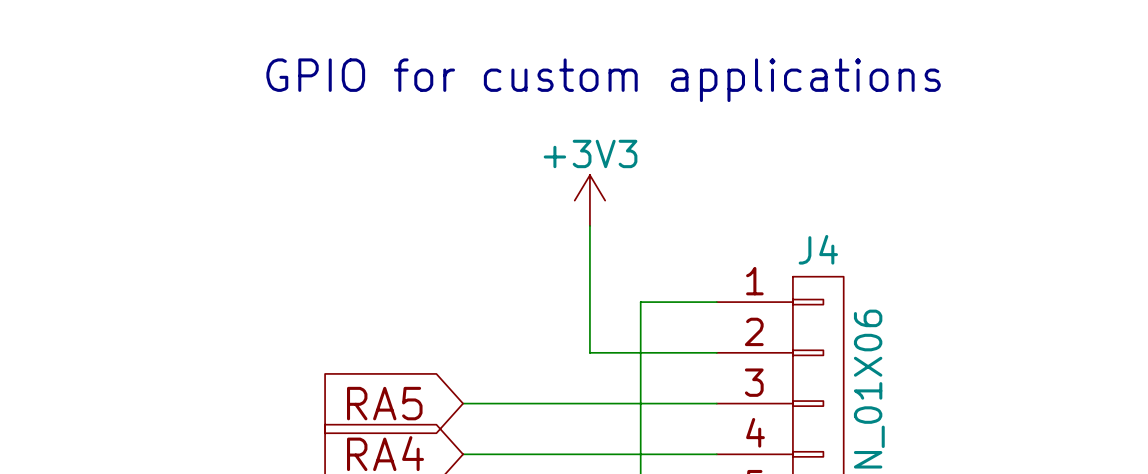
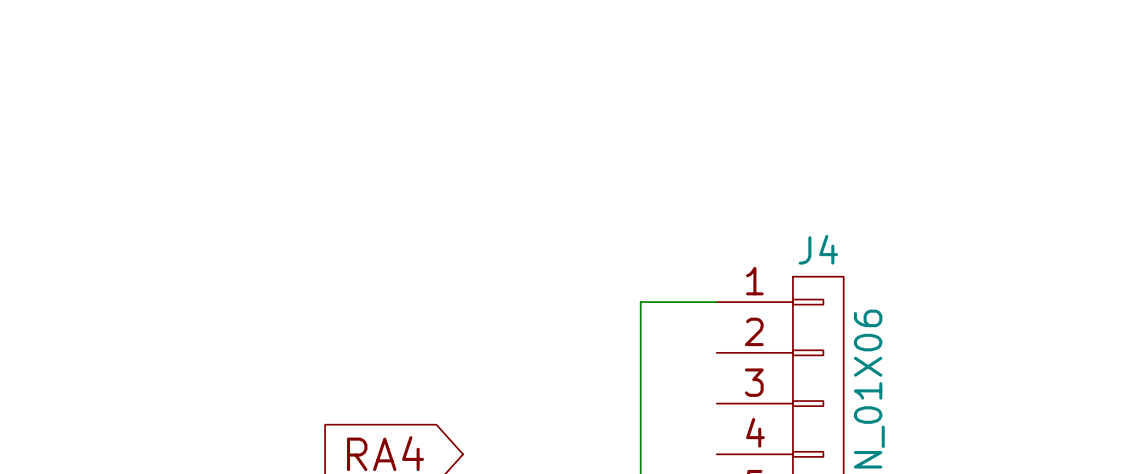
text: GPIO for custom applications (603, 80) -> none
power symbol: +3V3 (589, 200) -> none
wire: (589, 225) (589, 352) (716, 352) -> none
global label: RA5 (384, 403) -> none
wire: (463, 403) (716, 403) -> none
wire: (463, 454) (716, 454) -> none

